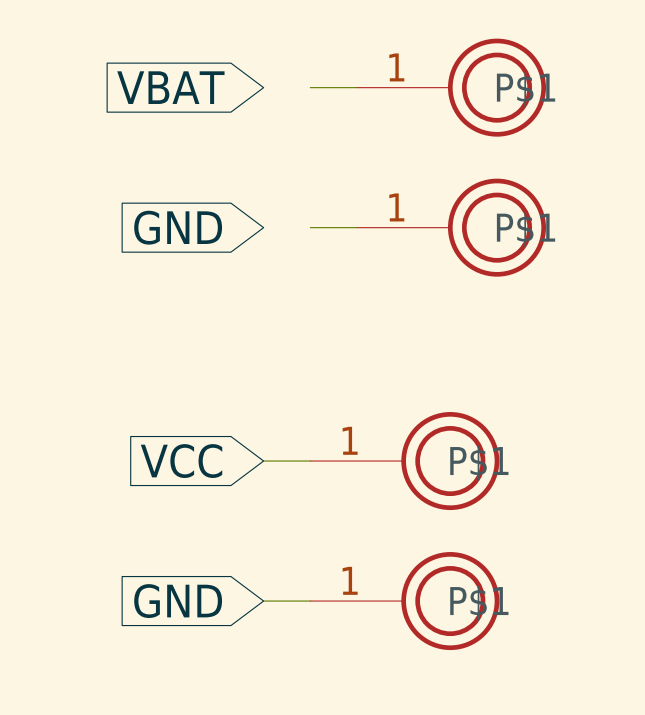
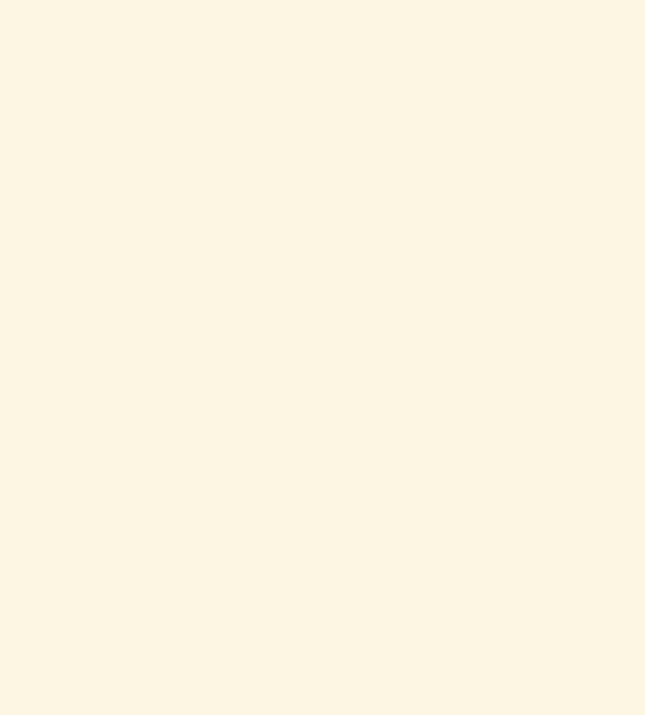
global label: VBAT (170, 87) -> none
wire: (310, 87) (356, 87) -> none
part: (451, 87) -> none
global label: GND (178, 227) -> none
wire: (310, 227) (356, 227) -> none
part: (451, 227) -> none
global label: VCC (181, 461) -> none
wire: (263, 461) (310, 461) -> none
part: (404, 461) -> none
global label: GND (178, 601) -> none
wire: (263, 601) (310, 601) -> none
part: (404, 601) -> none

